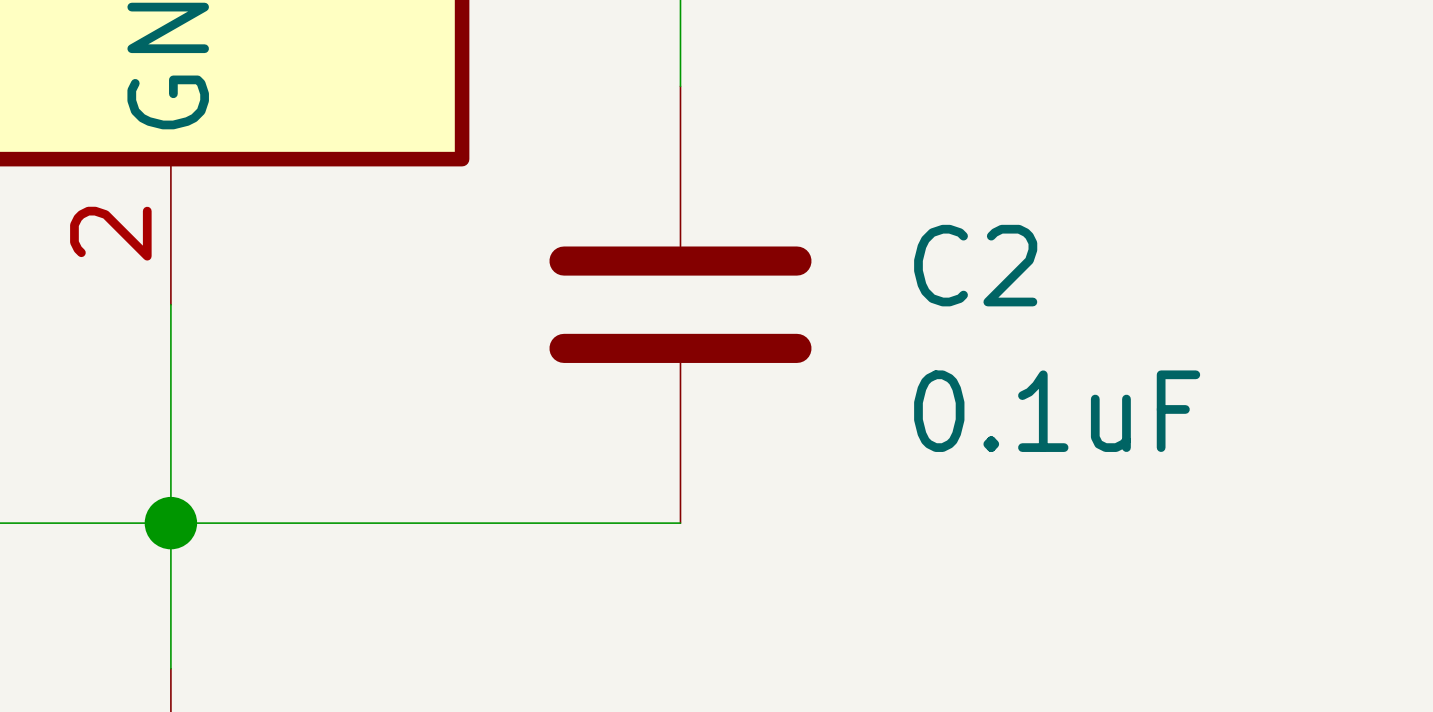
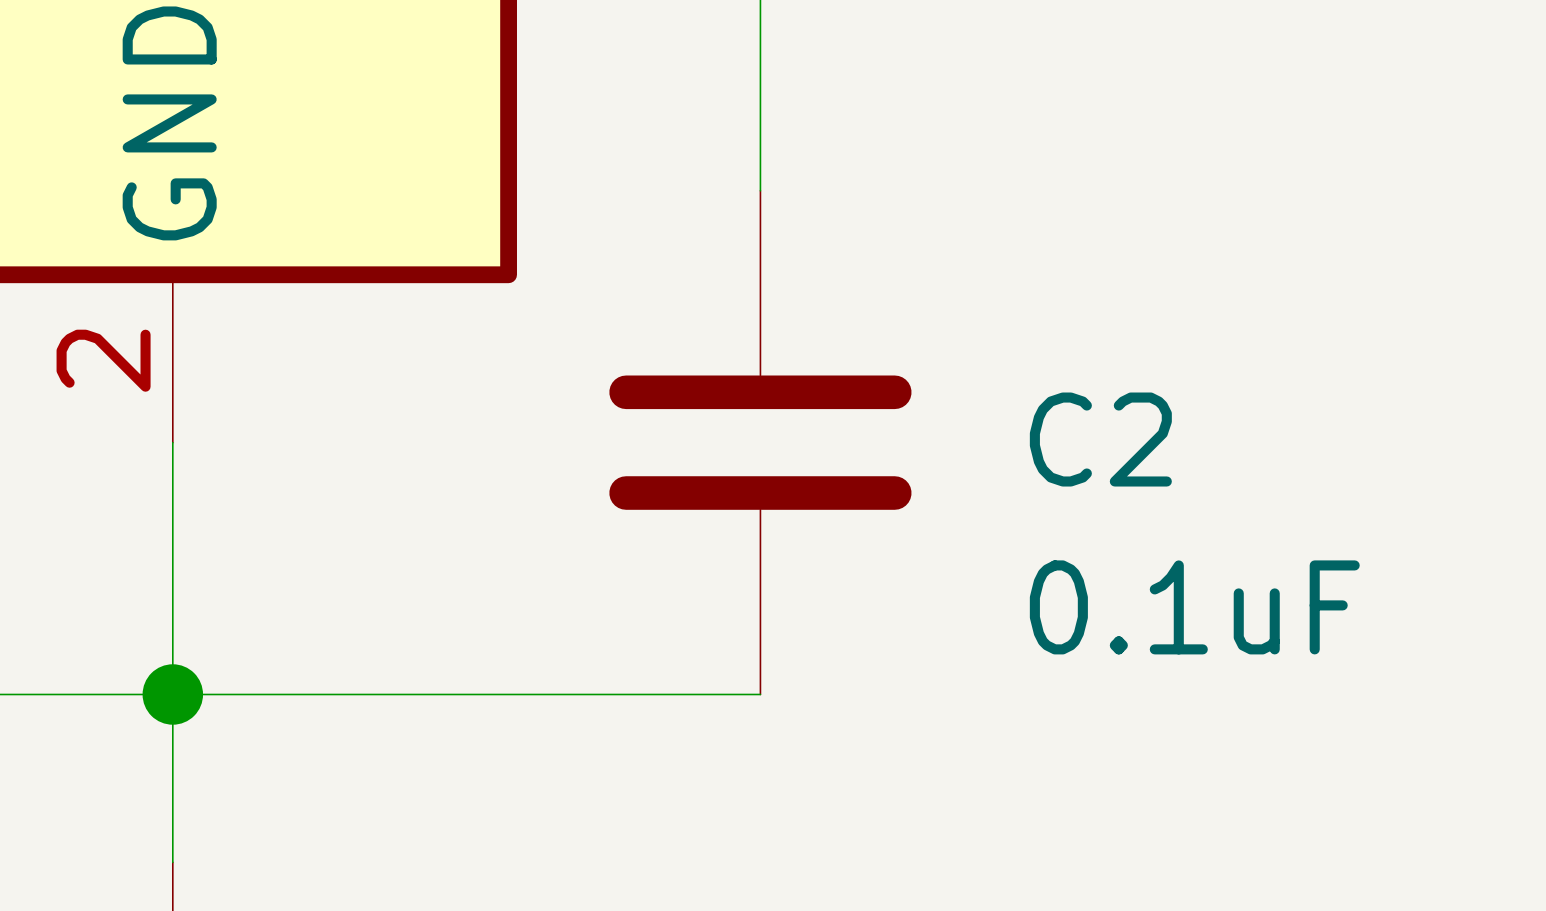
C2 name position: C2 (975, 265) -> C2 (1100, 439)
C2 value position: 0.1uF (1057, 411) -> 0.1uF (1194, 607)

